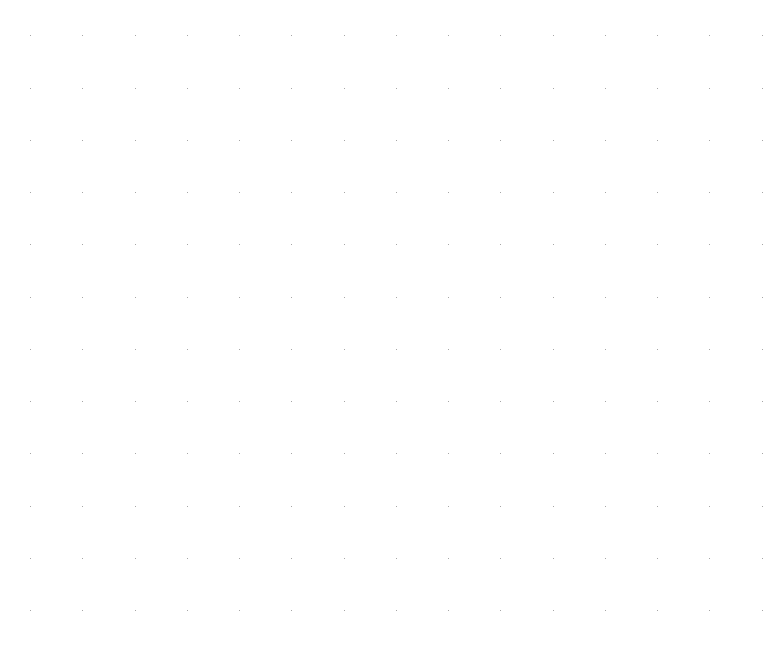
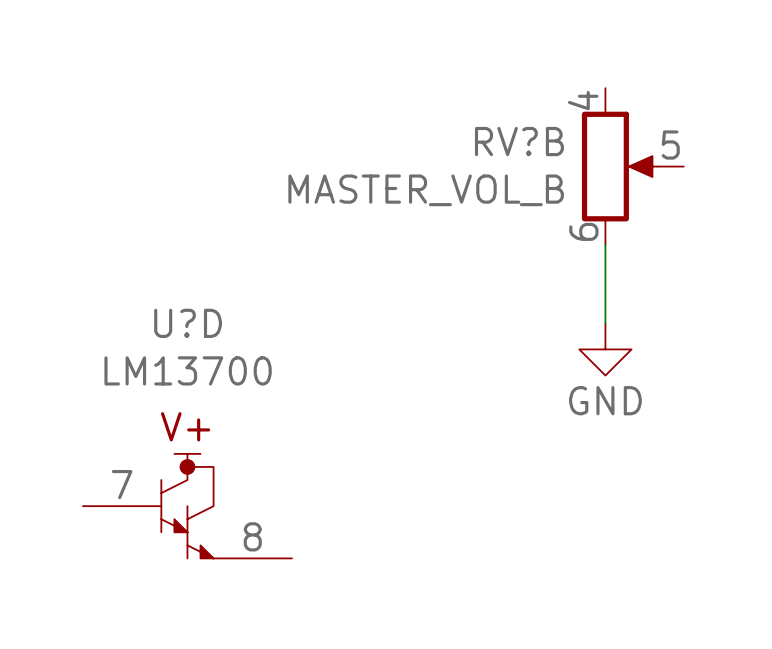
RV?B: none -> MASTER_VOL_B (632, 166)
wire: none -> (605, 244) (605, 323)
power symbol: none -> GND (605, 349)
U?D: none -> LM13700 (187, 506)

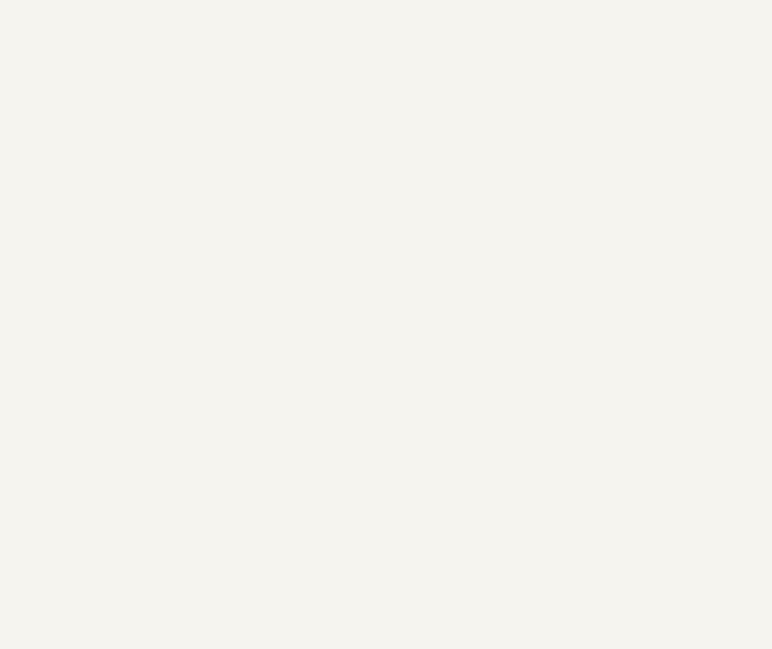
RV?B: MASTER_VOL_B (632, 166) -> none
wire: (605, 244) (605, 323) -> none
power symbol: GND (605, 349) -> none
U?D: LM13700 (187, 506) -> none

